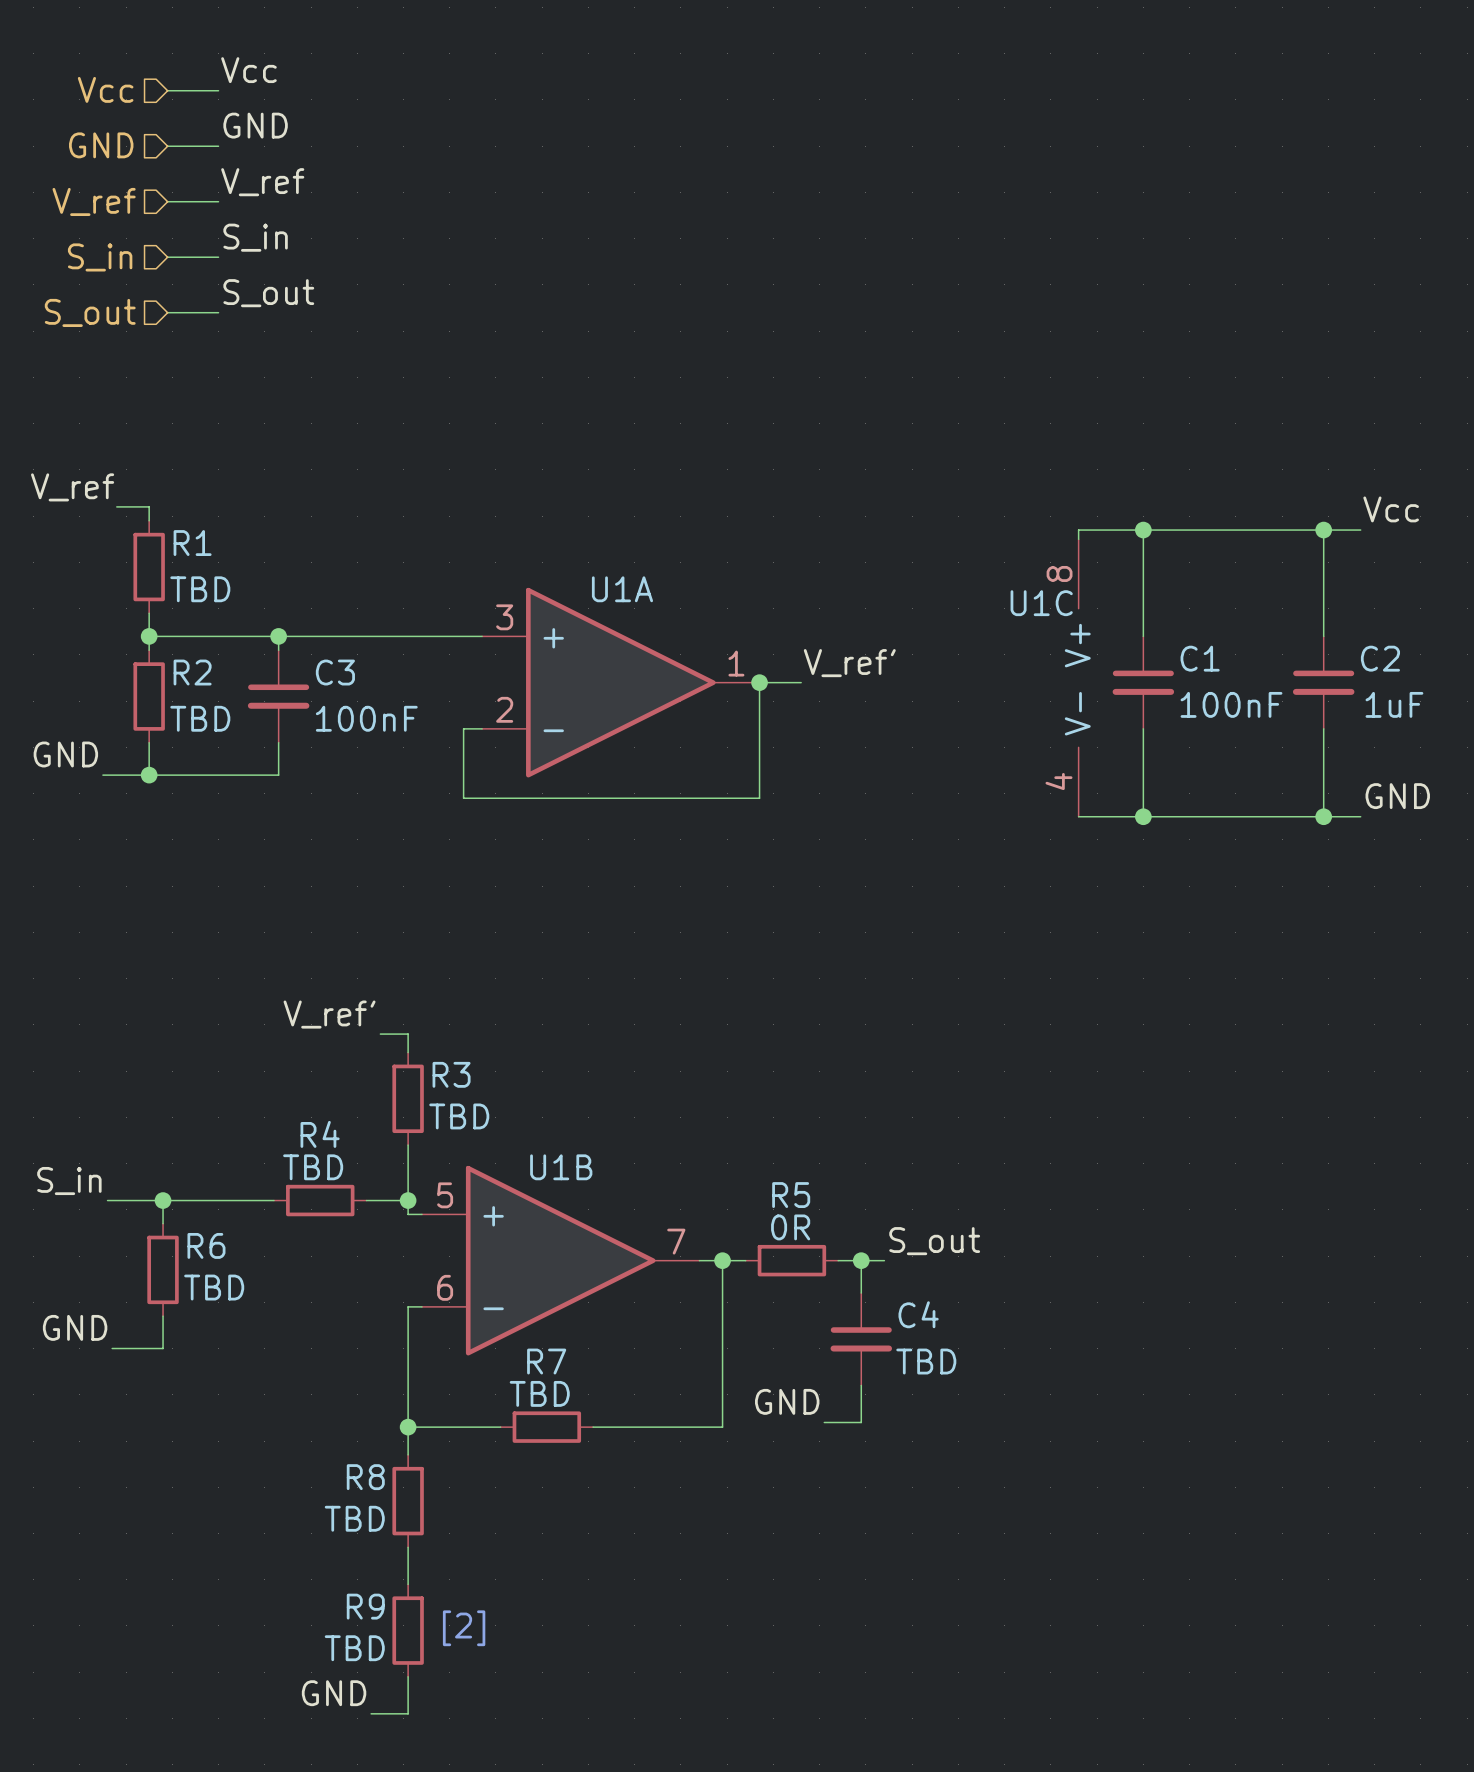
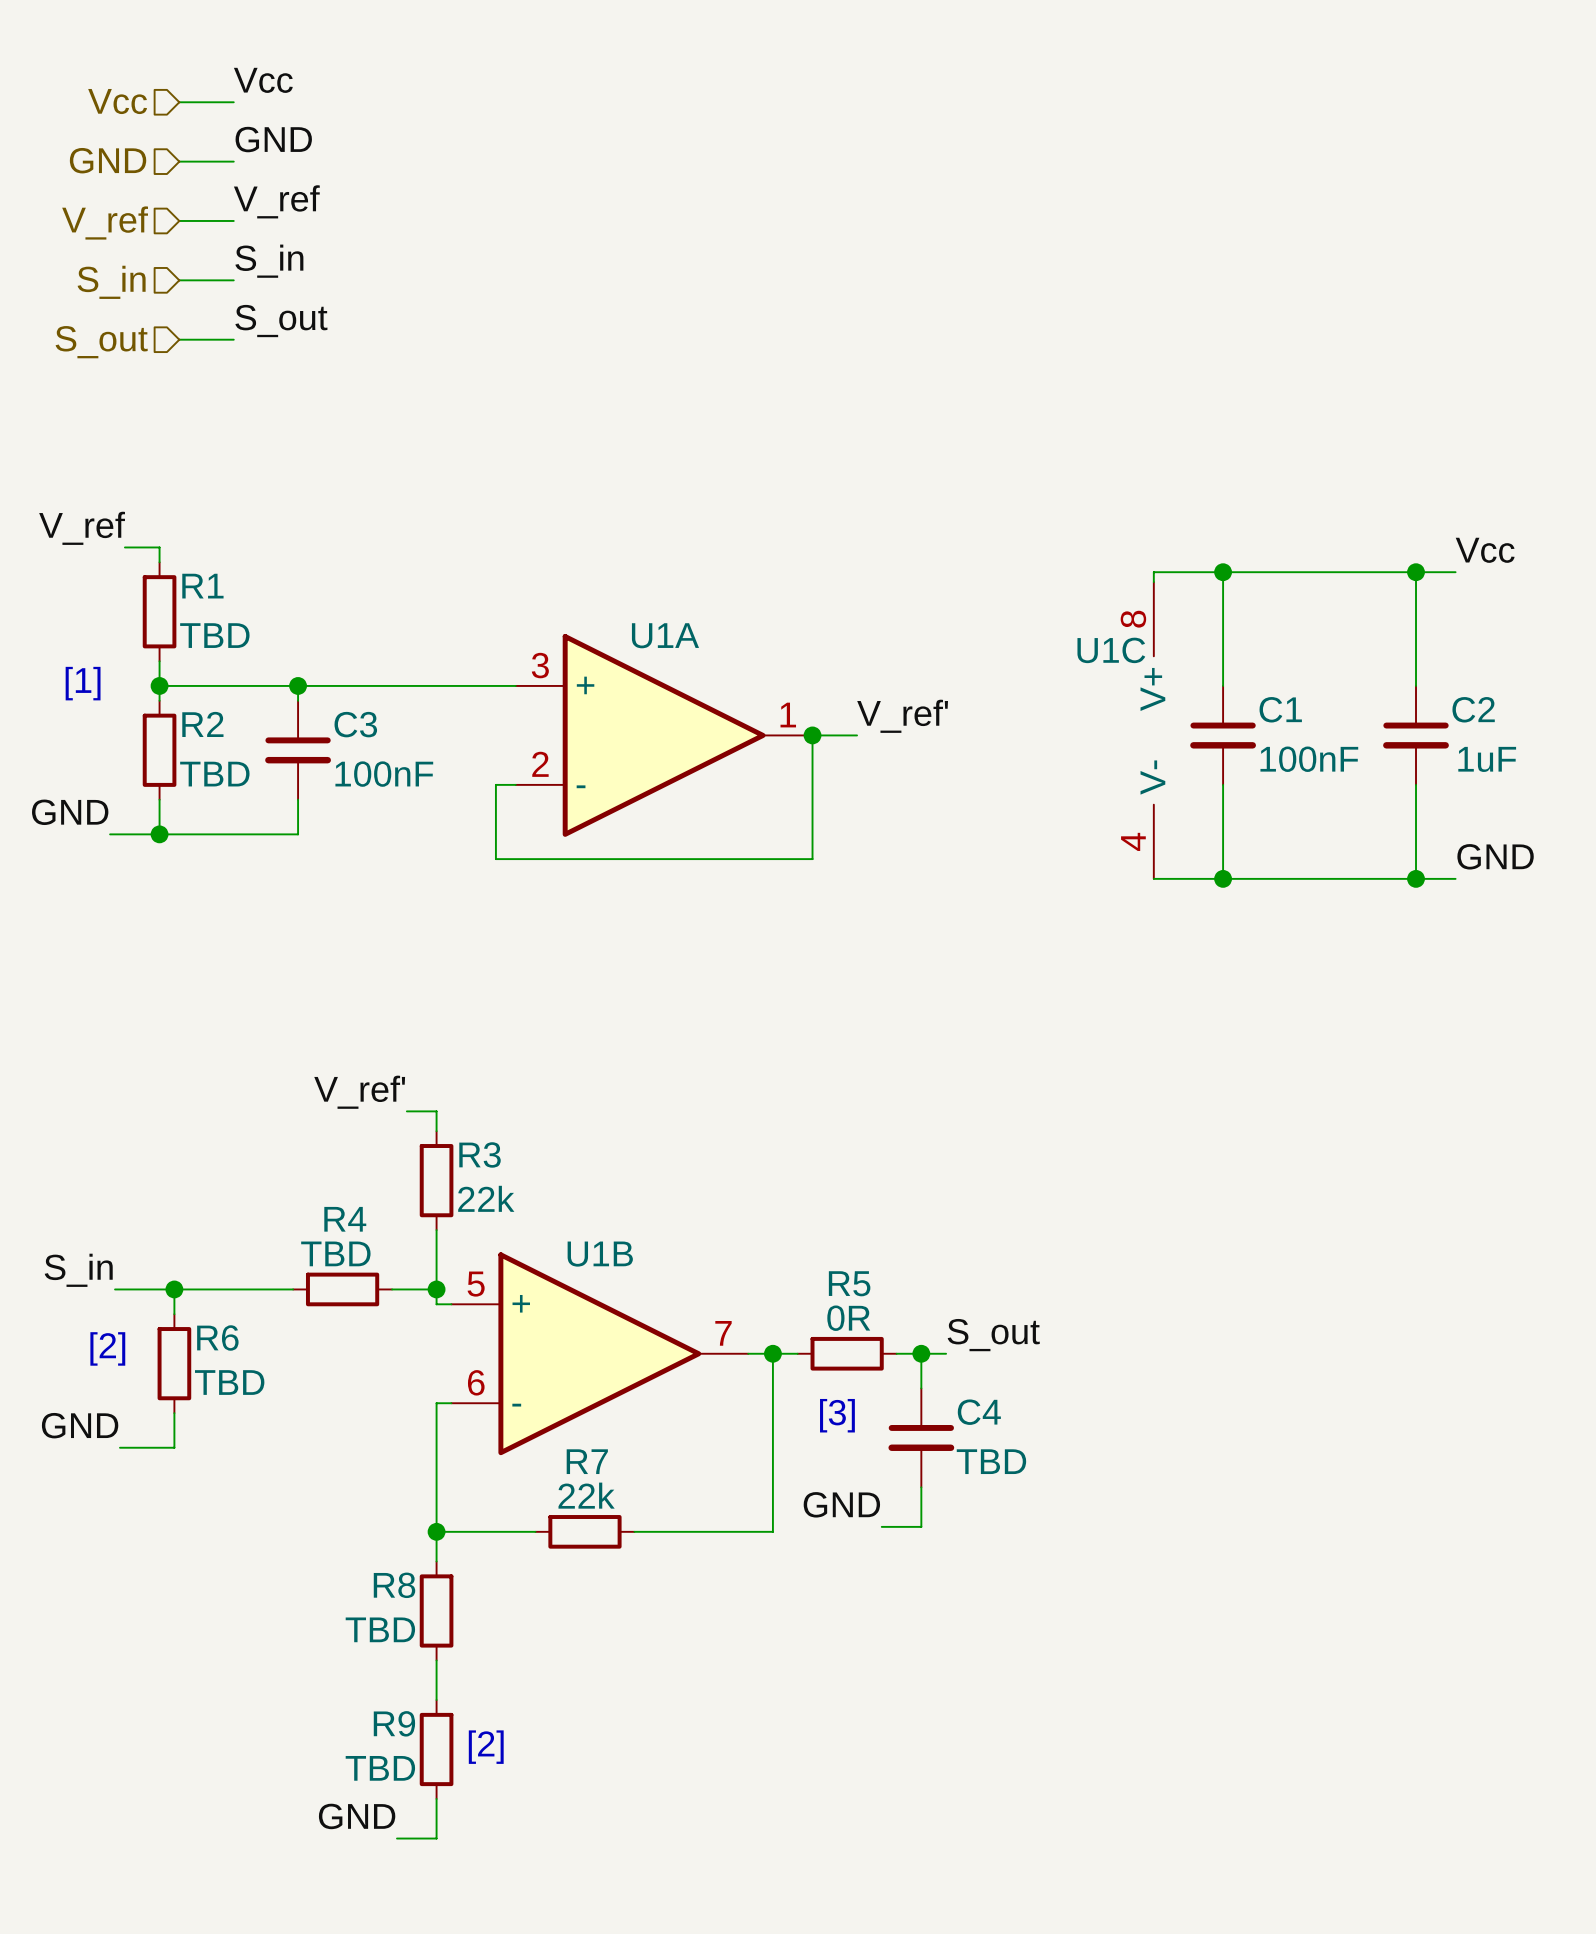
text: none -> [1] (83, 683)
R3 value: TBD (459, 1116) -> 22k (486, 1198)
text: none -> [2] (107, 1348)
text: none -> [3] (837, 1415)
R7 value: TBD (539, 1393) -> 22k (586, 1495)

